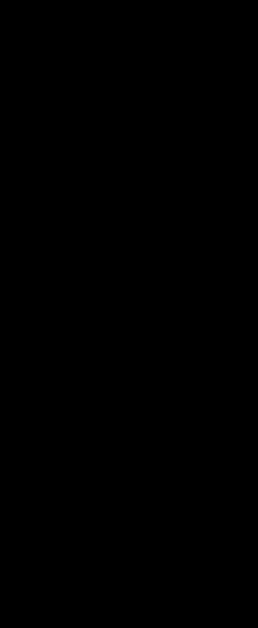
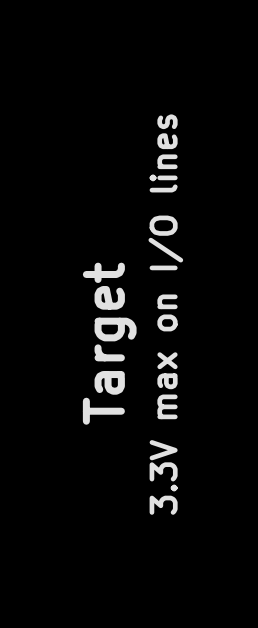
text: none -> 3.3V max on I/O lines (165, 314)
text: none -> Target (109, 343)

